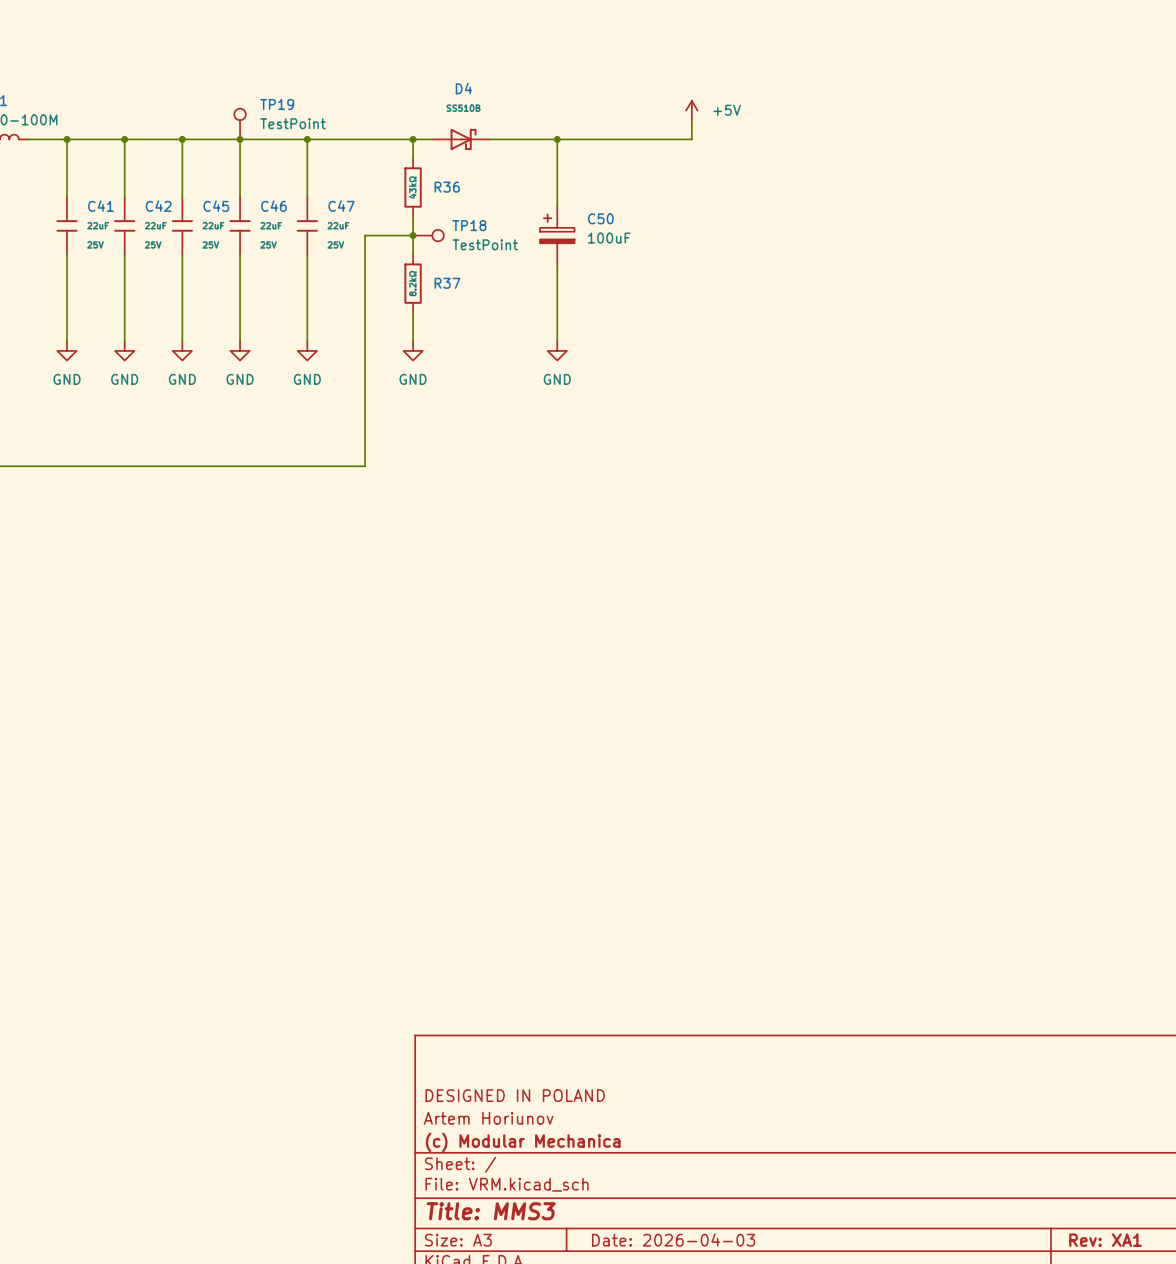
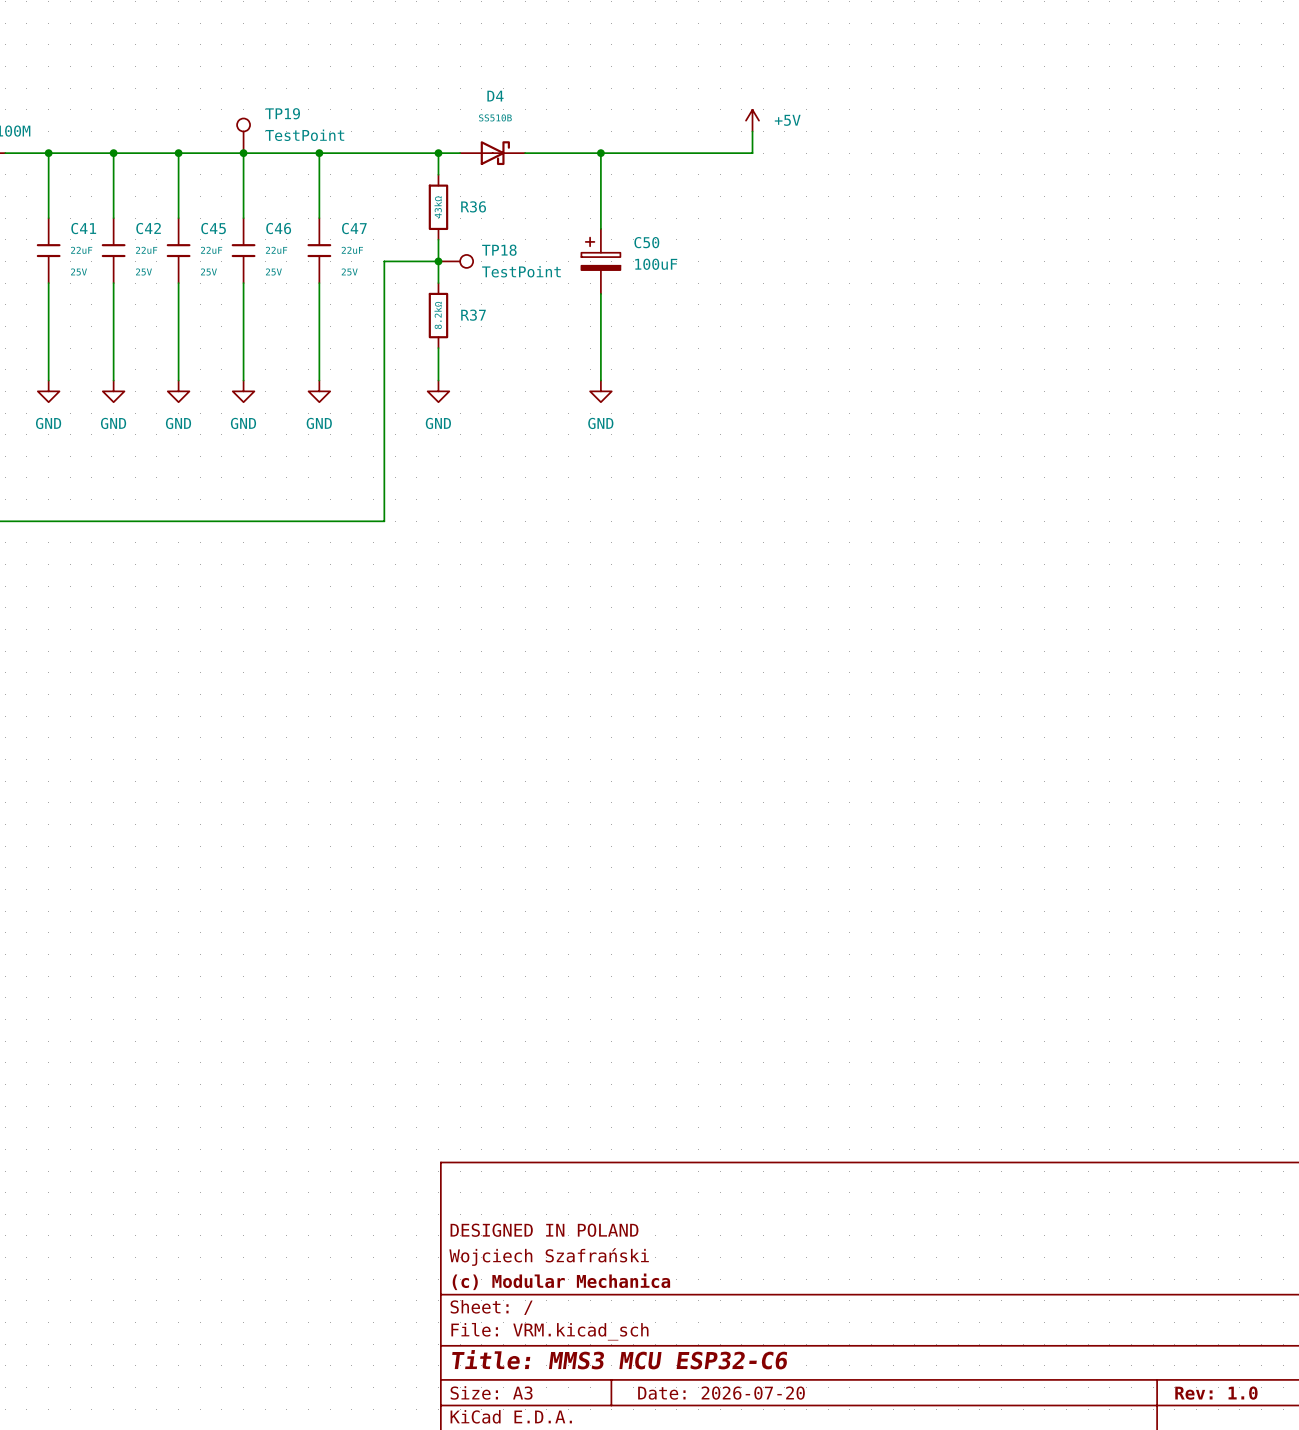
title block: Artem Horiunov (488, 1118) -> Wojciech Szafrański (549, 1257)
title block: Title: MMS3 (491, 1211) -> Title: MMS3 MCU ESP32-C6 (619, 1359)
title block: Date: 2026-04-03 (673, 1239) -> Date: 2026-07-20 (721, 1393)
title block: Rev: XA1 (1105, 1240) -> Rev: 1.0 (1216, 1393)

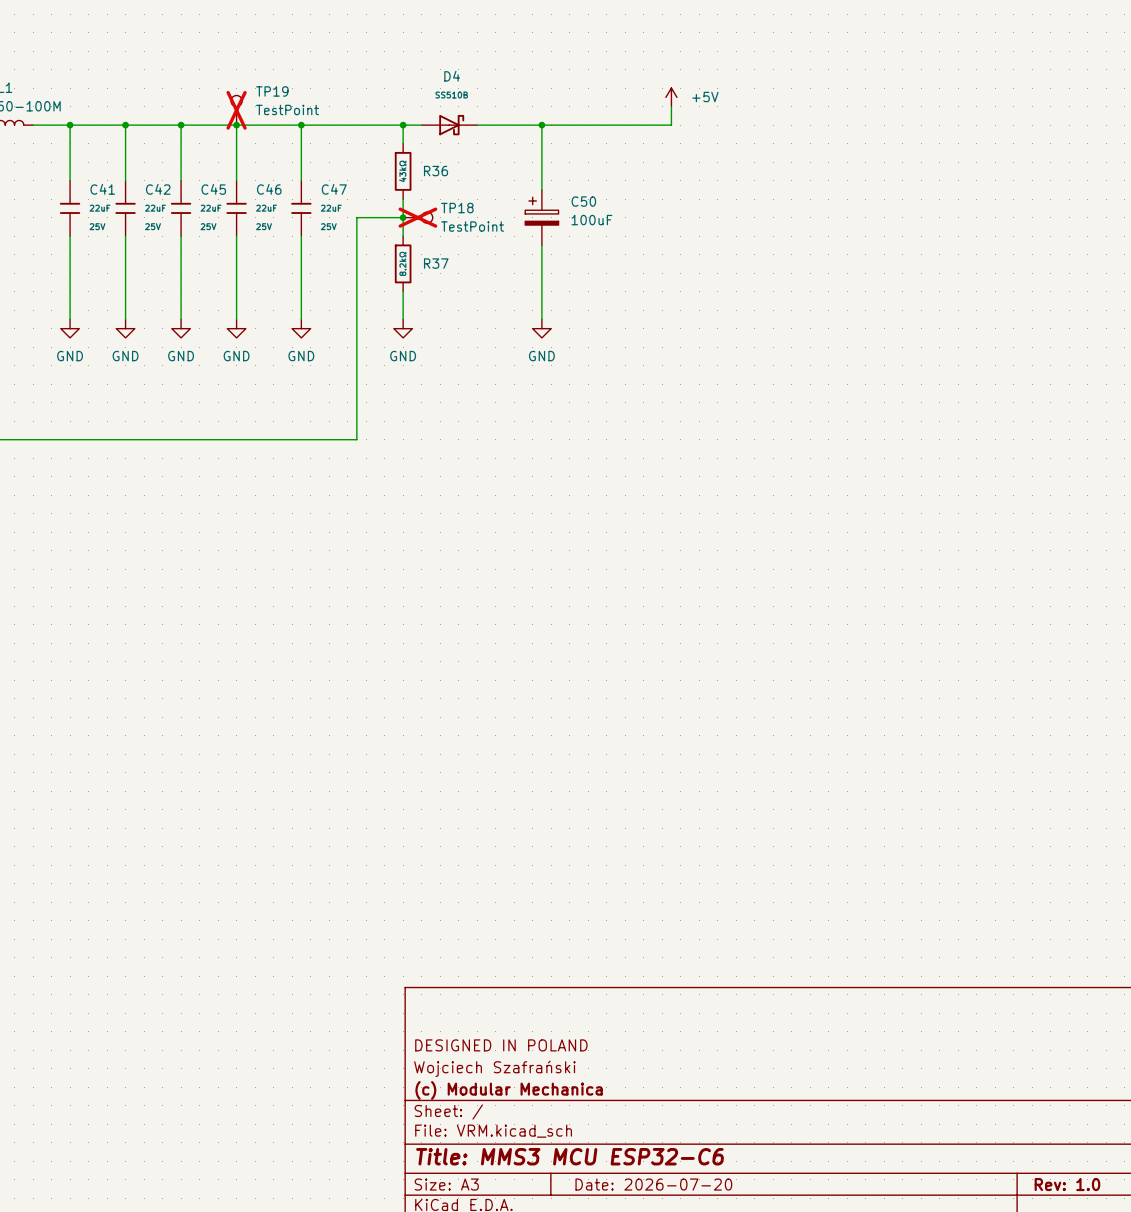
TP19 do-not-place cross: none -> (236, 110)
TP18 do-not-place cross: none -> (417, 217)

